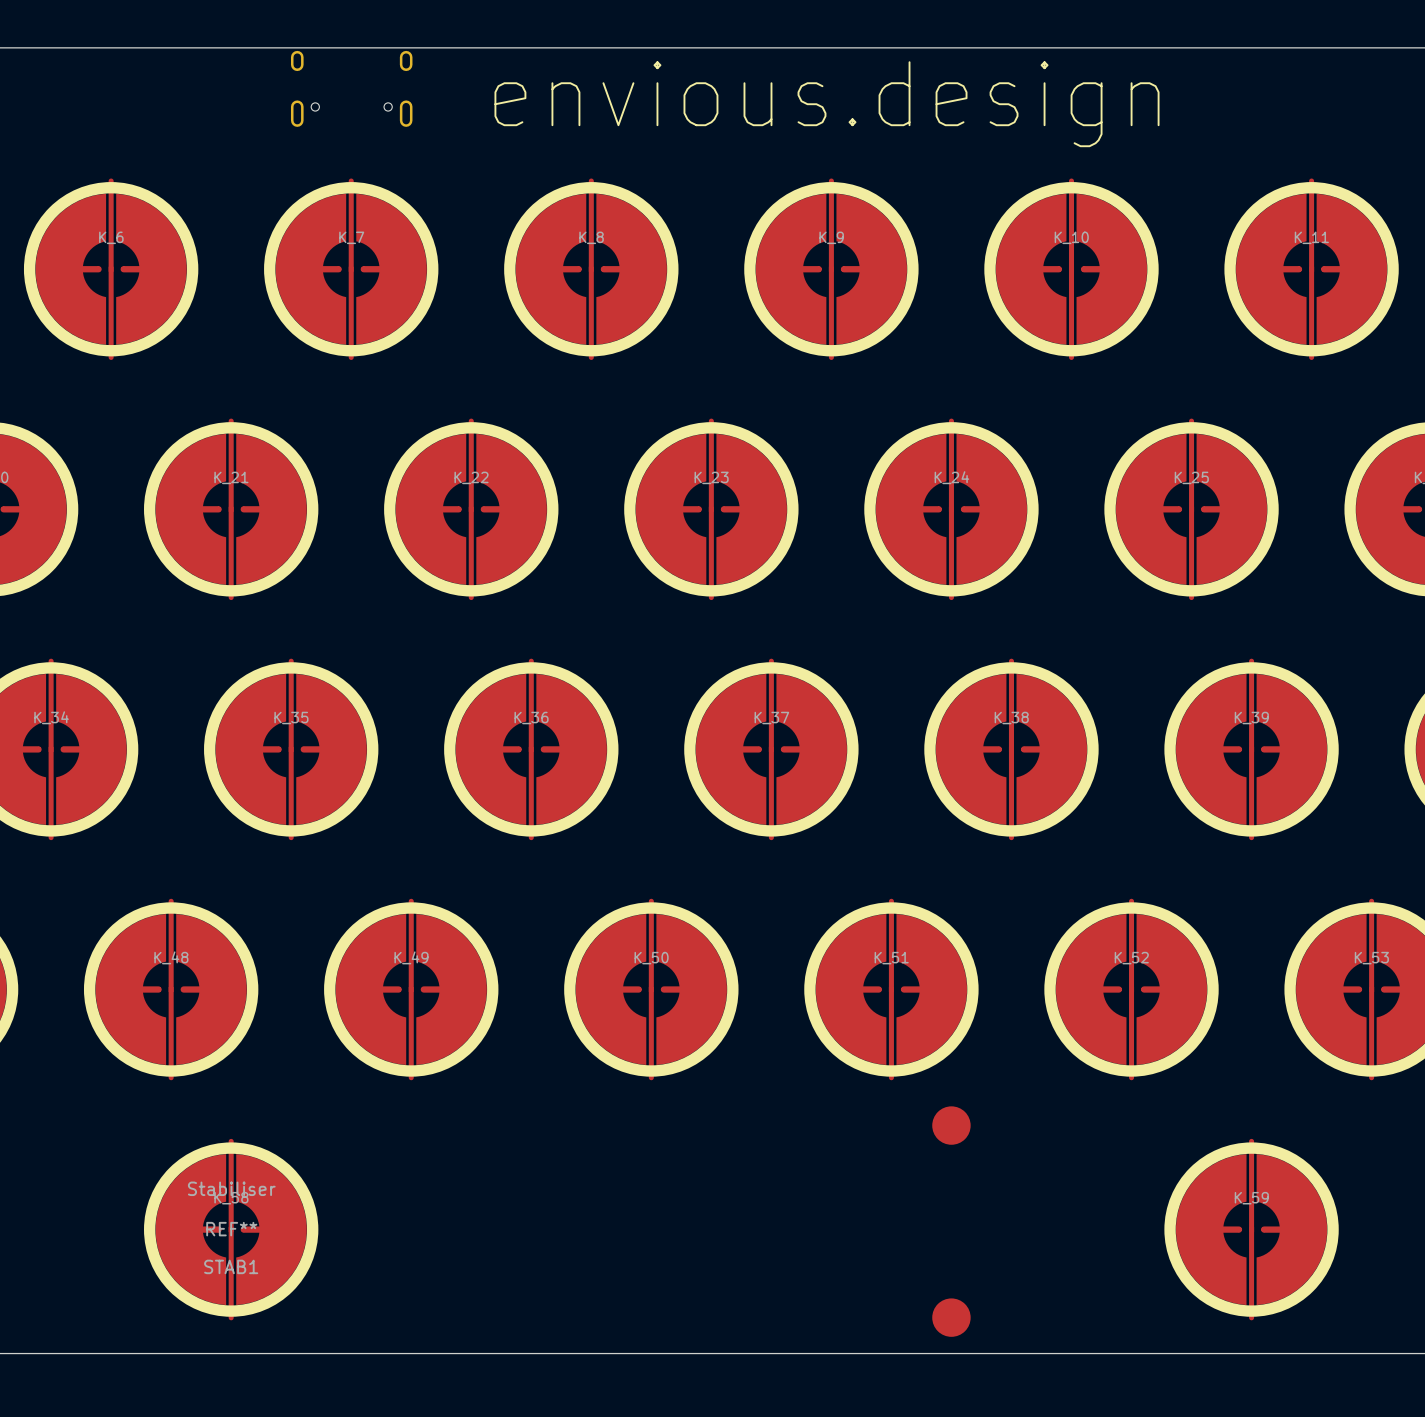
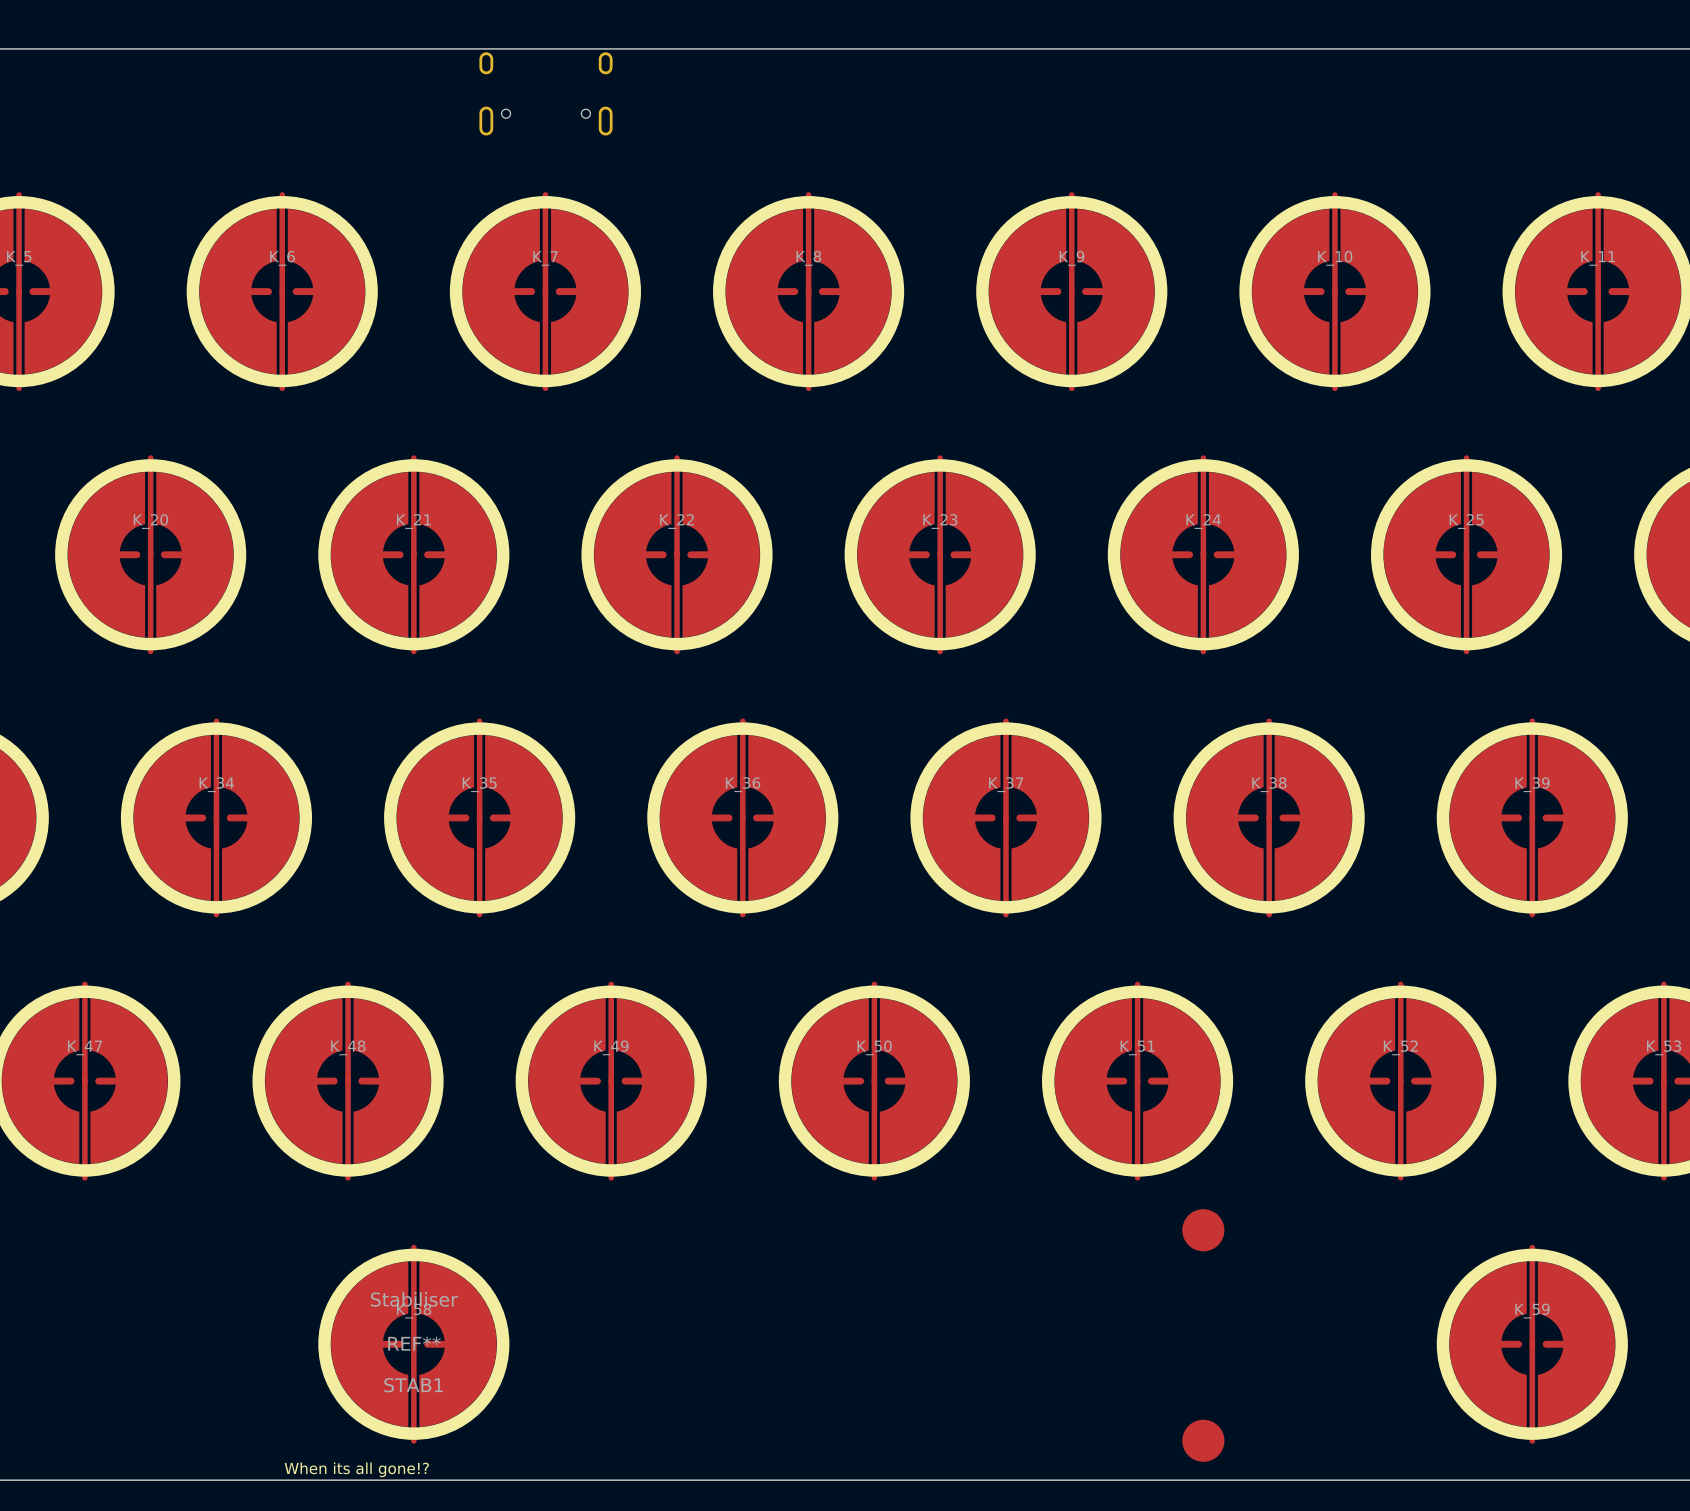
text: envious.design (827, 104) -> none
text: none -> When its all gone!? (356, 1469)

